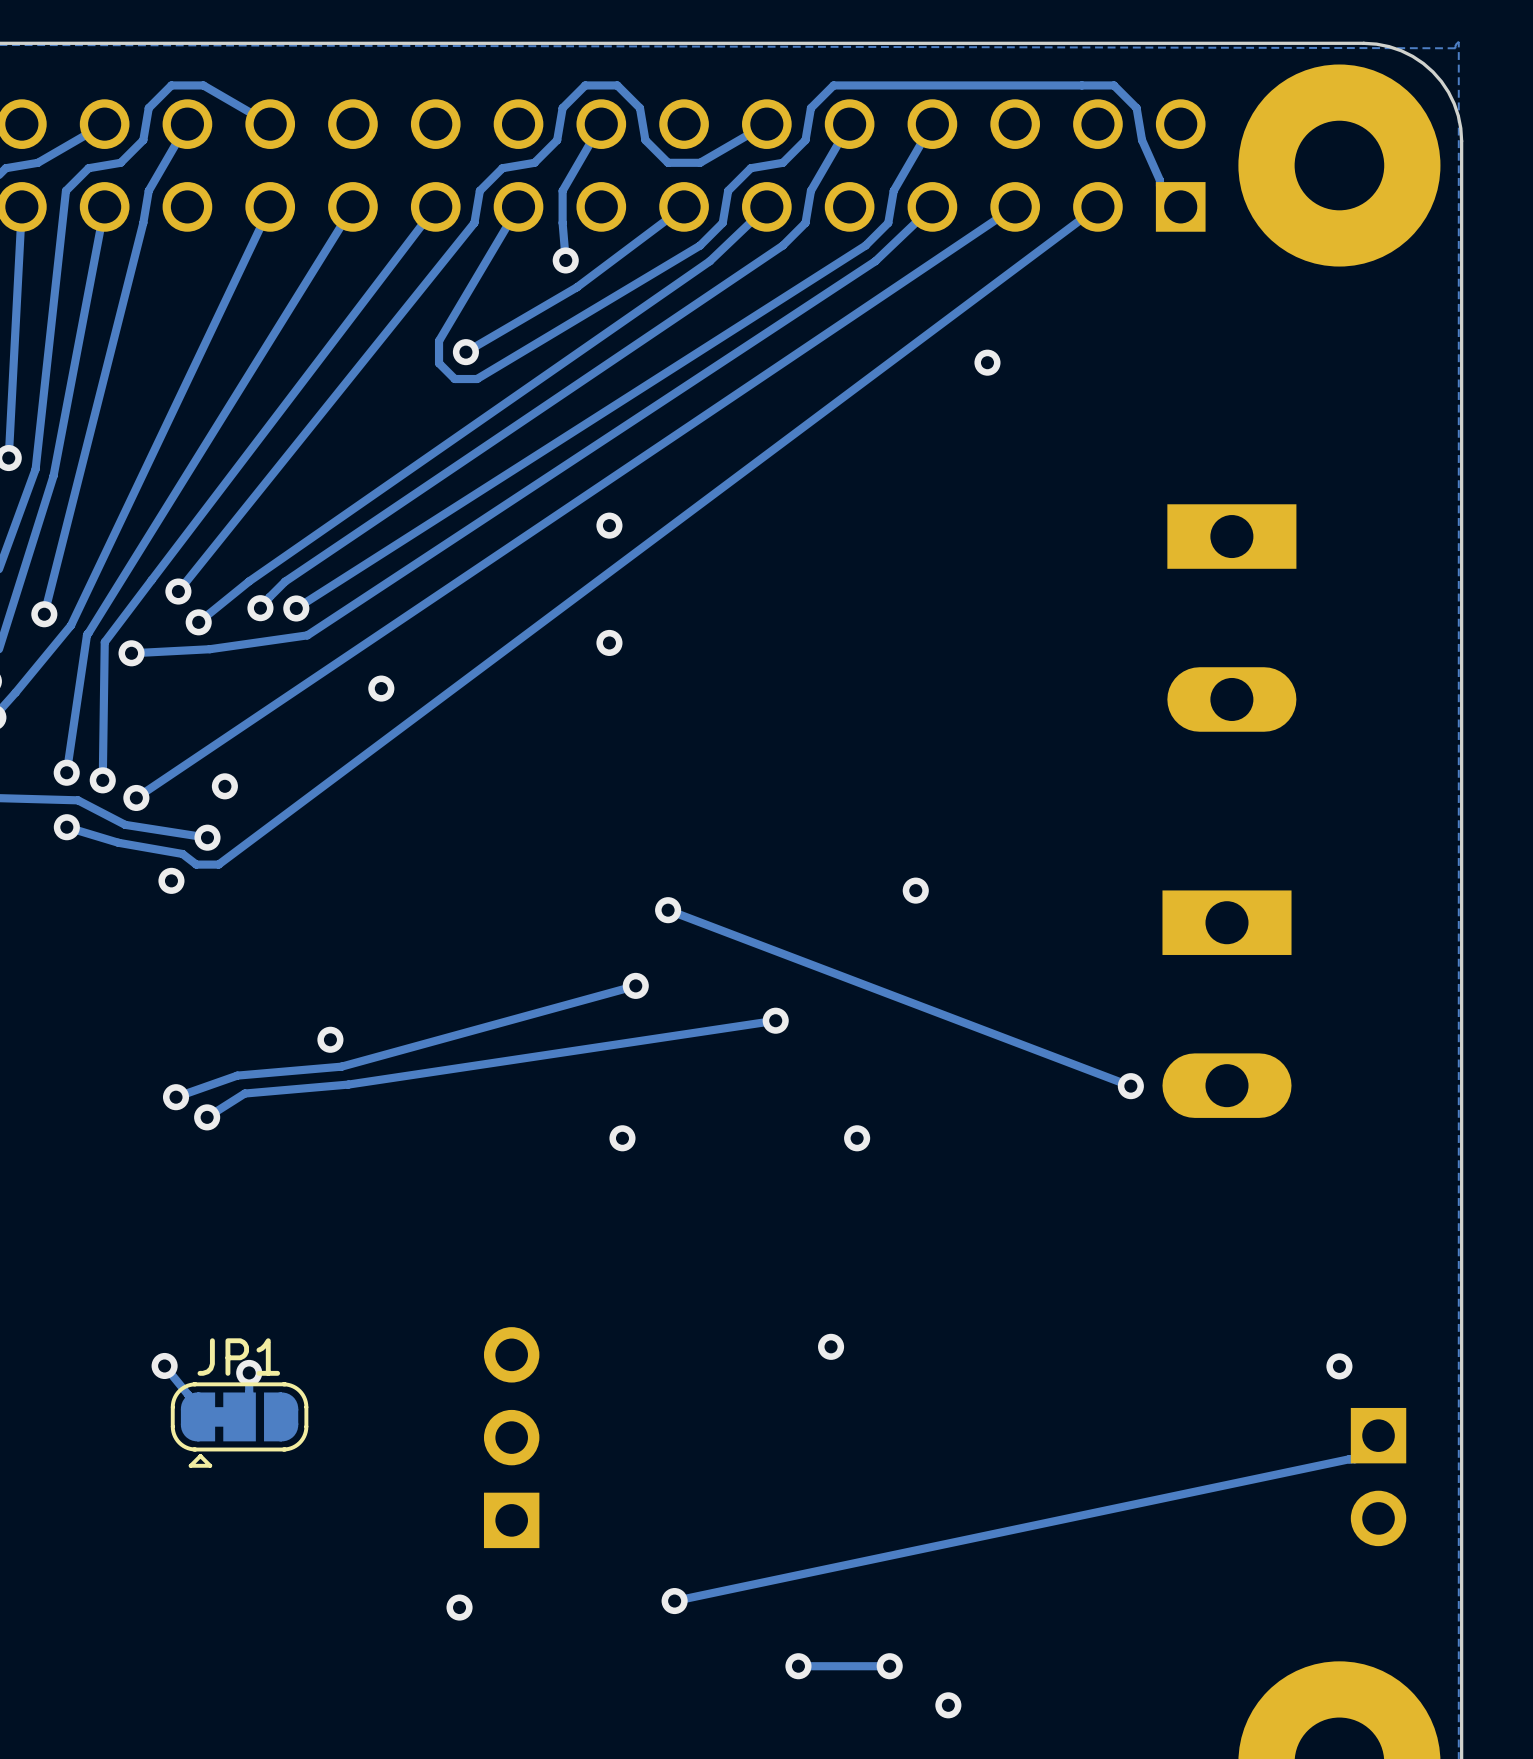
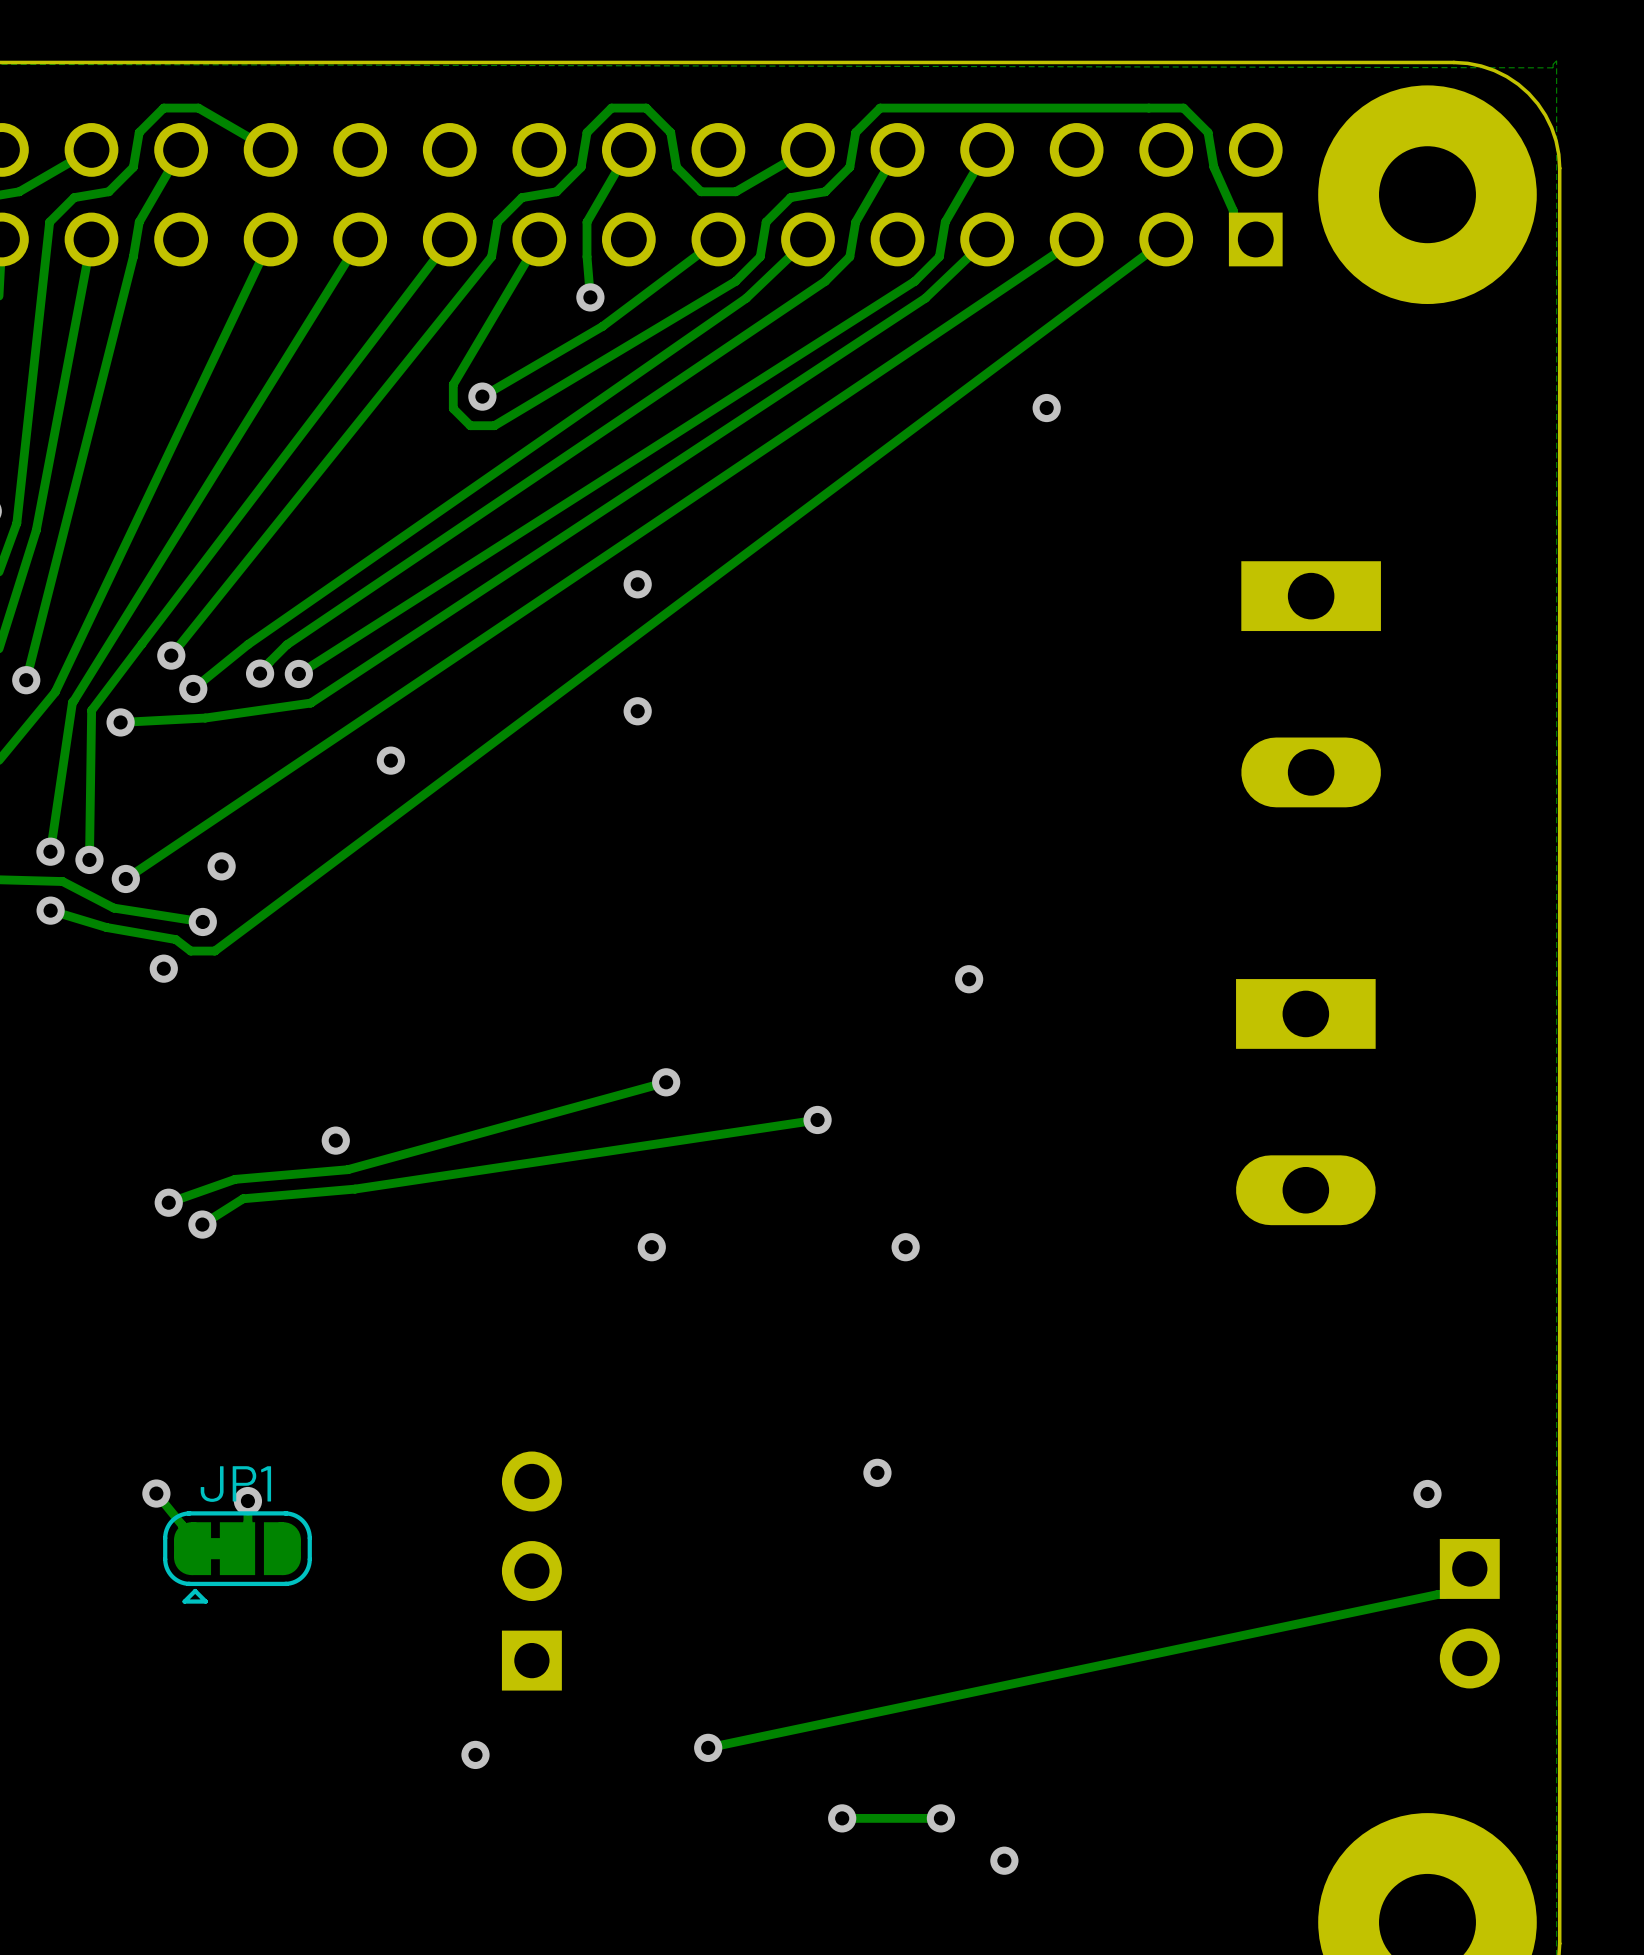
track: (668, 910) (1130, 1086) -> none
via: (668, 910) -> none
via: (1130, 1086) -> none

